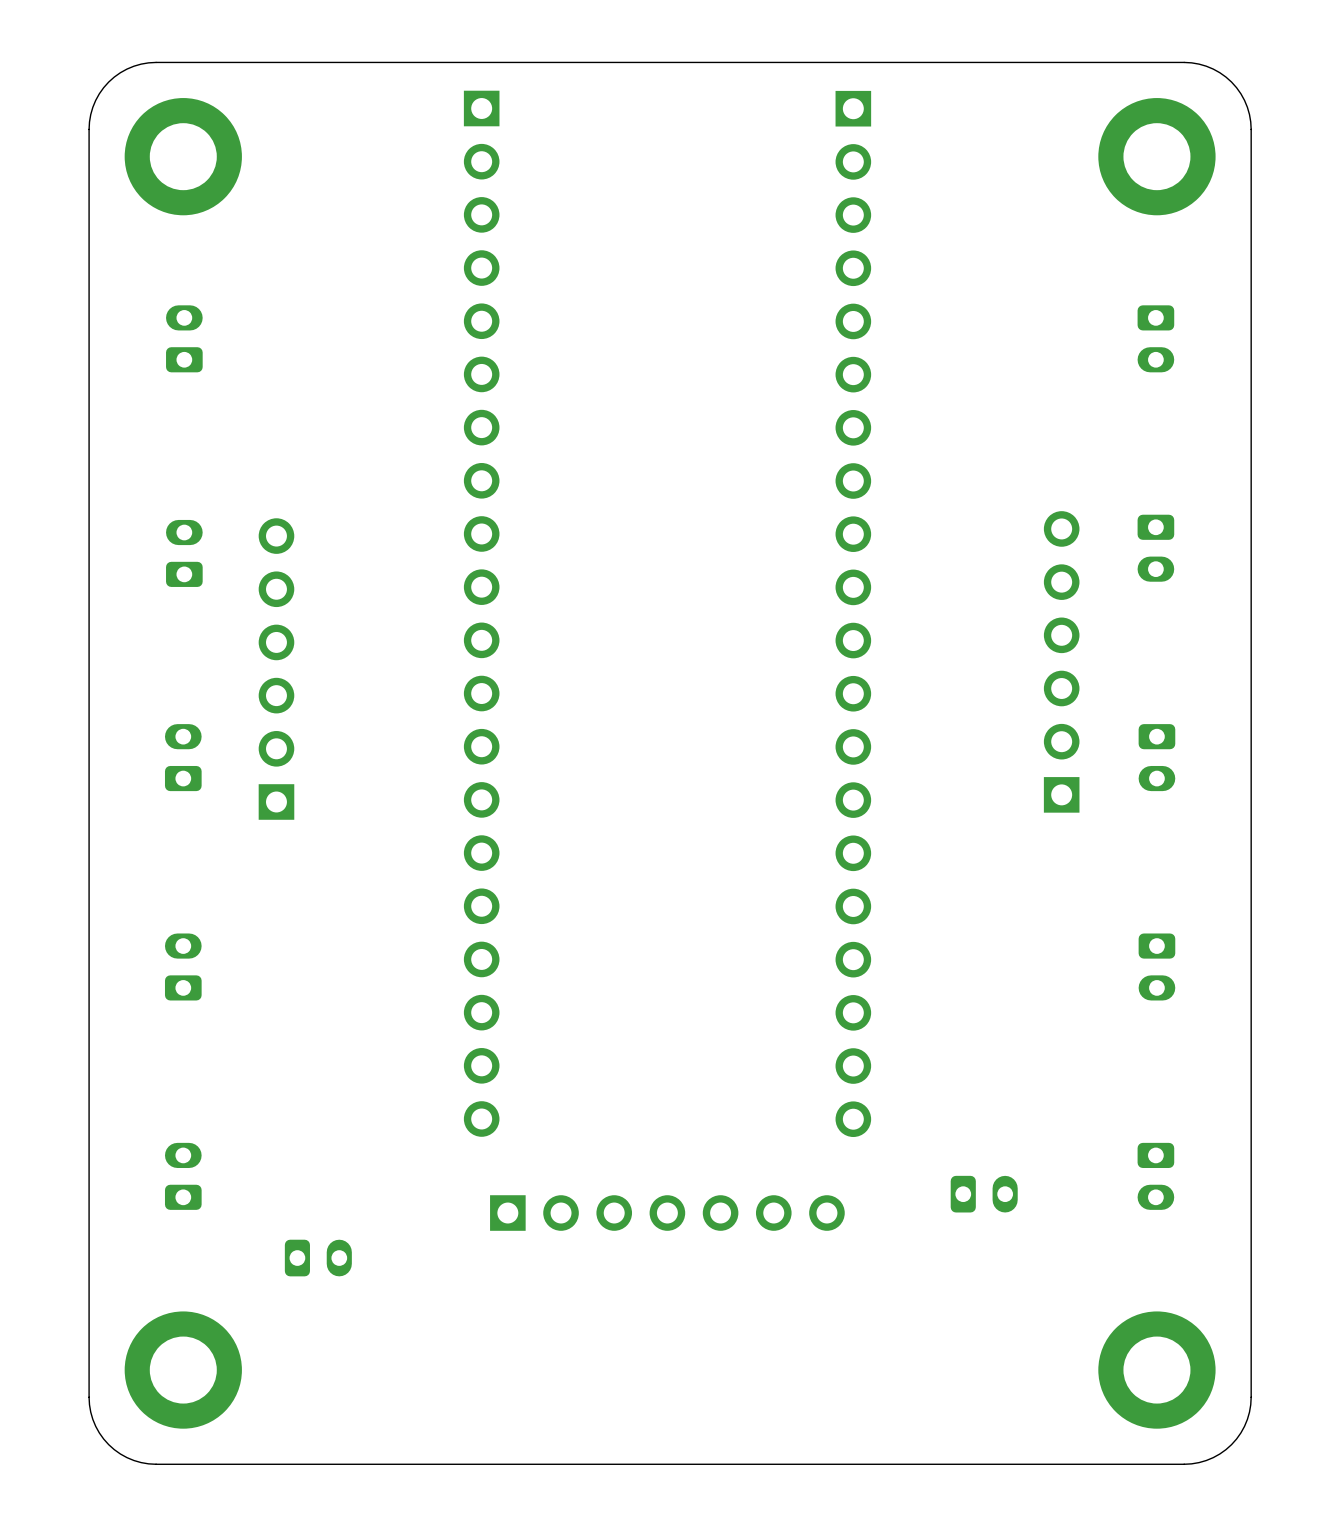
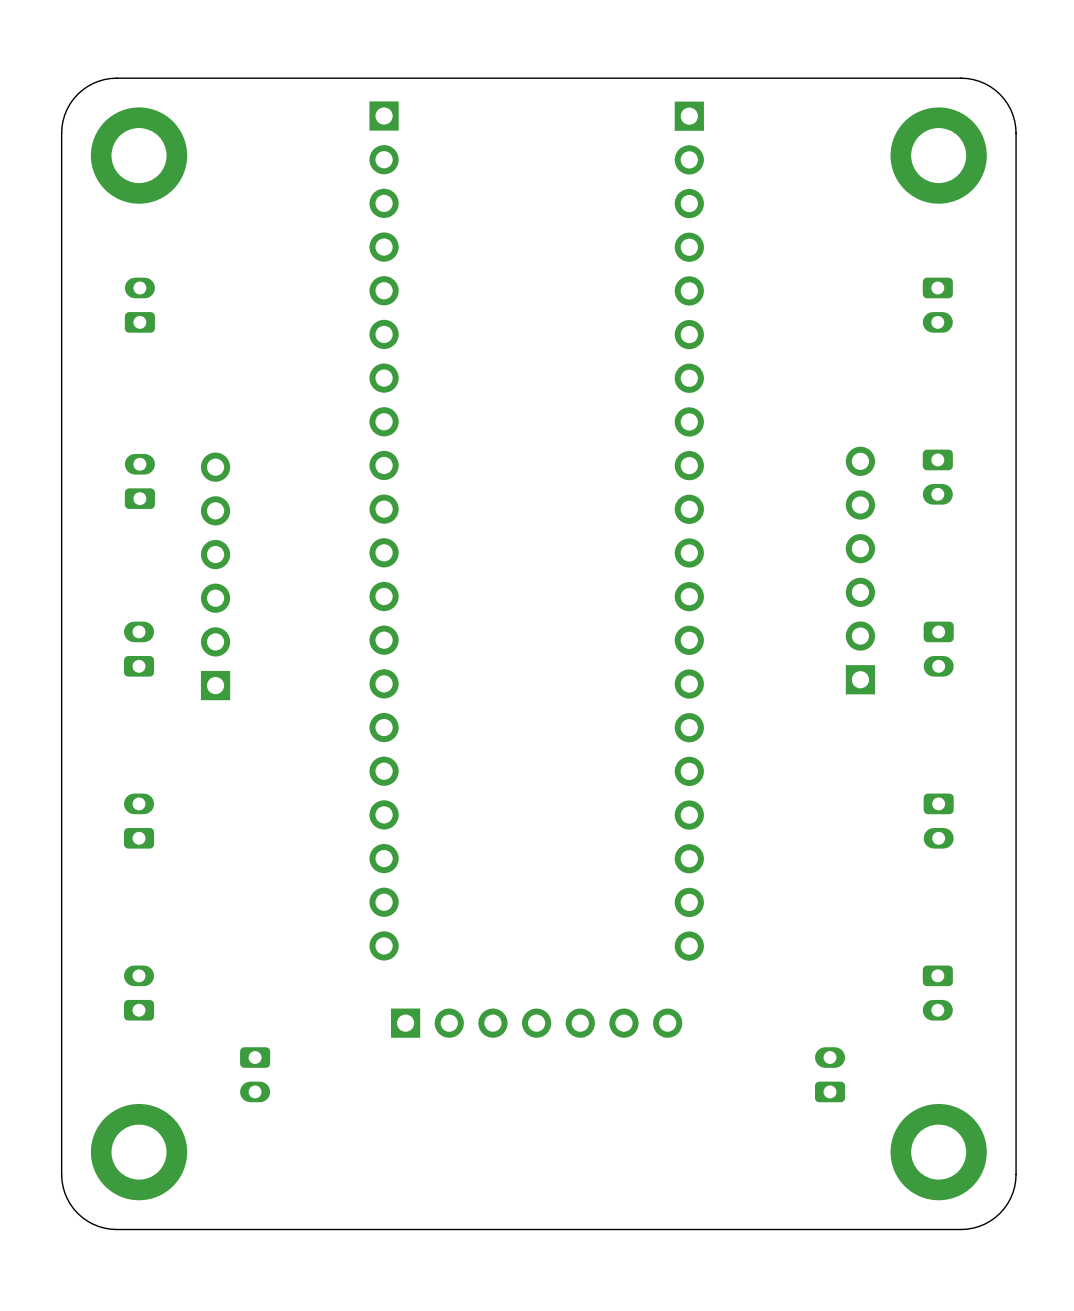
part rotation: 0° (984, 1194) -> 90° counterclockwise (830, 1074)
part position: (984, 1194) -> (830, 1074)
part rotation: 0° (318, 1258) -> 90° clockwise (255, 1074)

